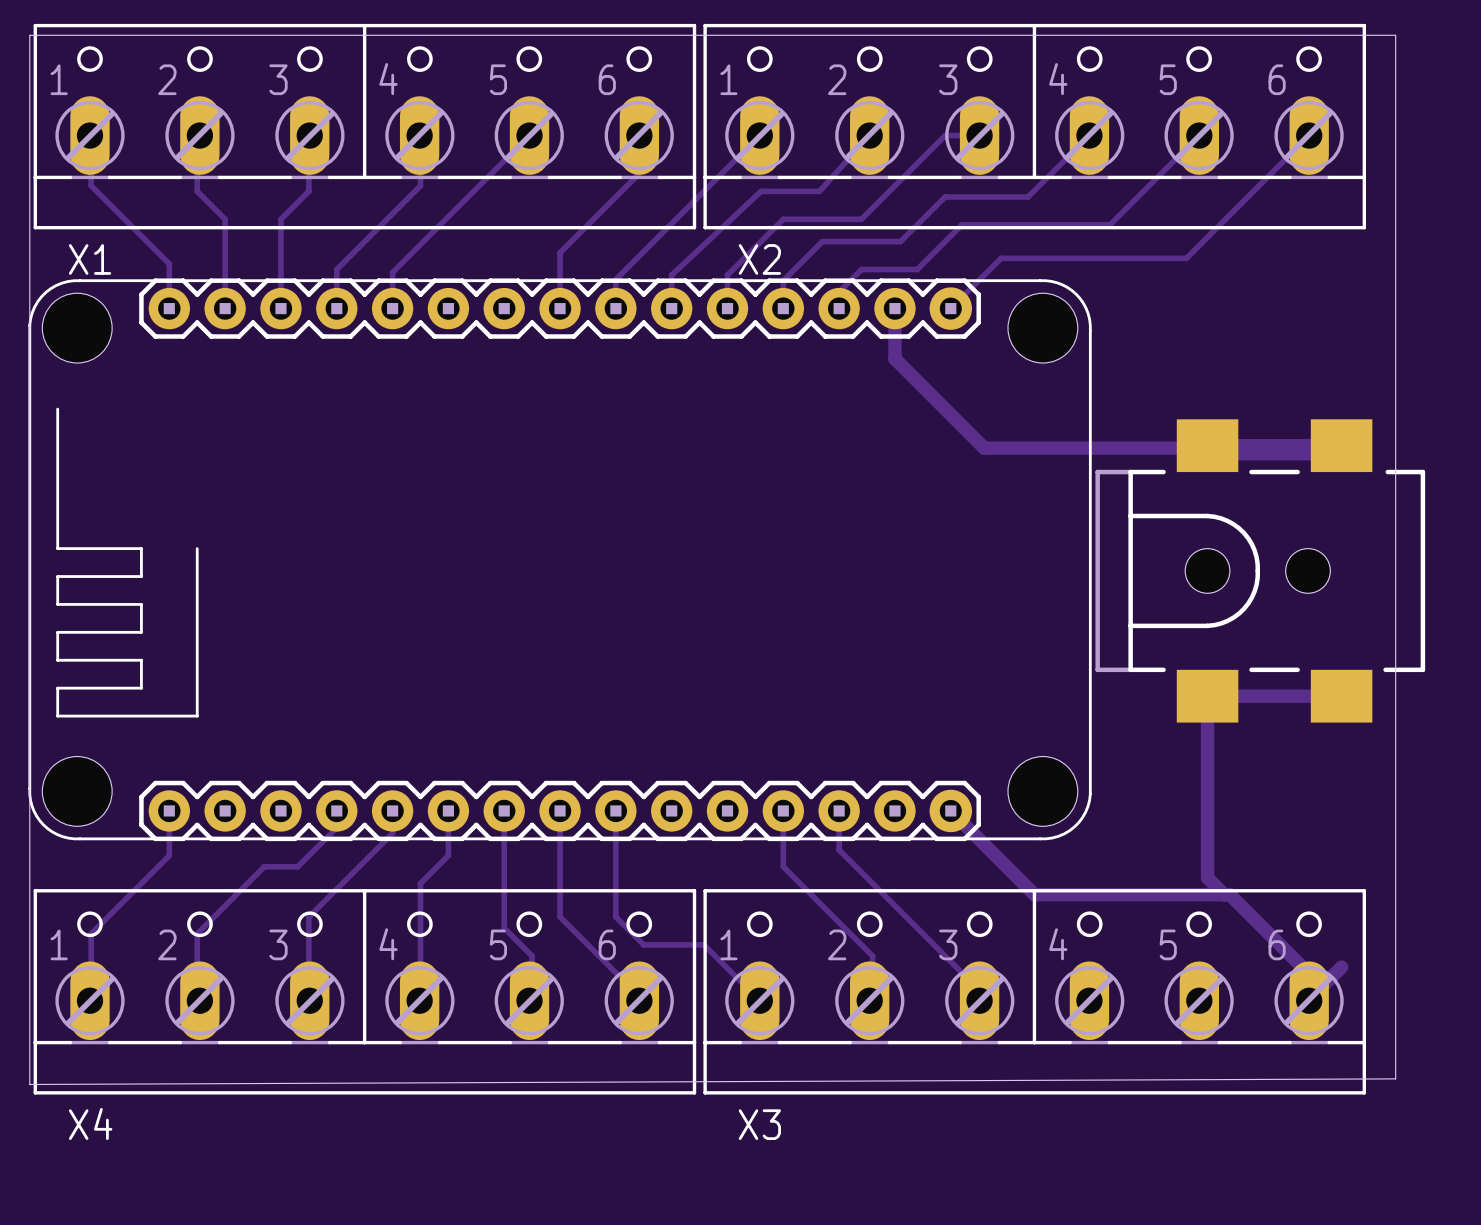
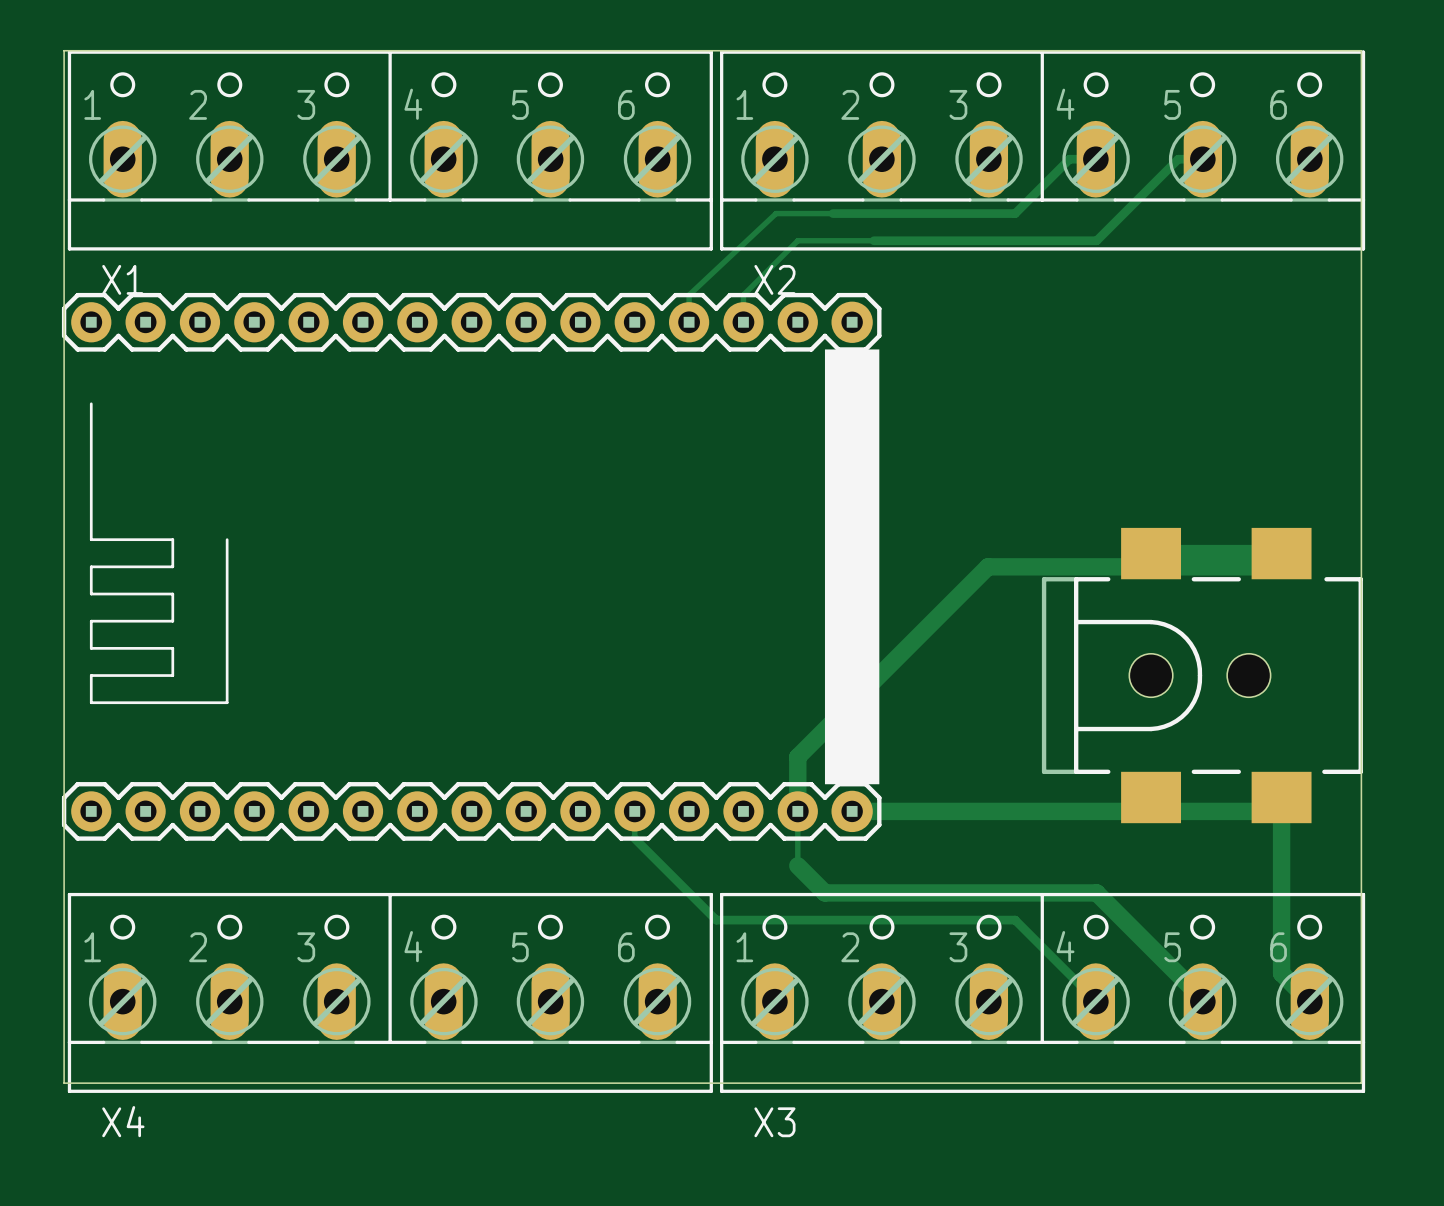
board edge: (29, 35) (1395, 35) (1395, 1078) (29, 1084) -> (64, 61) (64, 50) (1361, 50) (1361, 1083) (64, 1083)
track: (90, 135) (91, 185) (169, 263) (169, 308) -> none
track: (199, 135) (197, 138) (197, 191) (225, 219) (225, 308) -> none
track: (309, 135) (308, 191) (280, 219) (280, 308) -> none
track: (419, 135) (420, 185) (336, 269) (336, 308) -> none
track: (529, 135) (392, 272) (392, 308) -> none
track: (639, 135) (638, 174) (560, 252) (560, 308) -> none
track: (759, 135) (615, 279) (615, 308) -> none
track: (869, 135) (819, 191) -> none
track: (979, 135) (945, 135) (861, 219) -> none
track: (1089, 135) (1028, 196) (945, 196) (900, 241) (822, 241) (783, 280) (783, 308) -> (1095, 159) (1069, 159) (1015, 213) (832, 213)
track: (1199, 135) (1110, 224) (961, 224) (917, 269) (861, 269) (839, 291) (839, 308) -> (1202, 159) (1178, 159) (1096, 240) (873, 240)
track: (1309, 135) (1186, 258) (1001, 258) (950, 308) -> none
track: (894, 308) (894, 358) (984, 448) (1201, 448) (1207, 453) (1352, 453) (1344, 445) (1207, 445) -> none
track: none -> (1151, 553) (1273, 553) (1286, 566) (988, 566) (797, 757) (797, 816)
part: none -> (471, 566)
part: (560, 559) -> none
part position: (1260, 570) -> (1202, 675)
track: (1341, 696) (1210, 696) (1207, 693) (1207, 877) (1224, 894) -> none
track: none -> (852, 811) (1267, 811) (1281, 797) (1281, 973) (1309, 1001)
track: (169, 810) (169, 855) (91, 933) (91, 1000) (85, 1006) (90, 1000) -> none
track: (336, 810) (336, 827) (297, 866) (264, 866) (197, 933) (197, 998) (199, 1000) -> none
track: (392, 810) (392, 833) (308, 917) (309, 1000) -> none
track: (448, 810) (448, 855) (420, 883) (419, 1000) -> none
track: (504, 810) (504, 928) (532, 956) (532, 998) (529, 1000) -> none
track: (560, 810) (560, 917) (643, 1000) (639, 1000) -> none
track: (839, 810) (839, 850) (979, 990) (979, 1000) -> none
track: (950, 810) (1034, 894) (1229, 894) (1309, 974) (1309, 1000) (1302, 1006) (1341, 967) -> none
track: (615, 833) (615, 917) (643, 944) (704, 944) (759, 1000) -> (634, 838) (716, 920) (1015, 920) (1095, 1001)
track: (783, 861) (783, 866) (872, 956) (872, 997) (869, 1000) -> (797, 865) (824, 892) (1096, 892) (1205, 1001) (1202, 1001)

